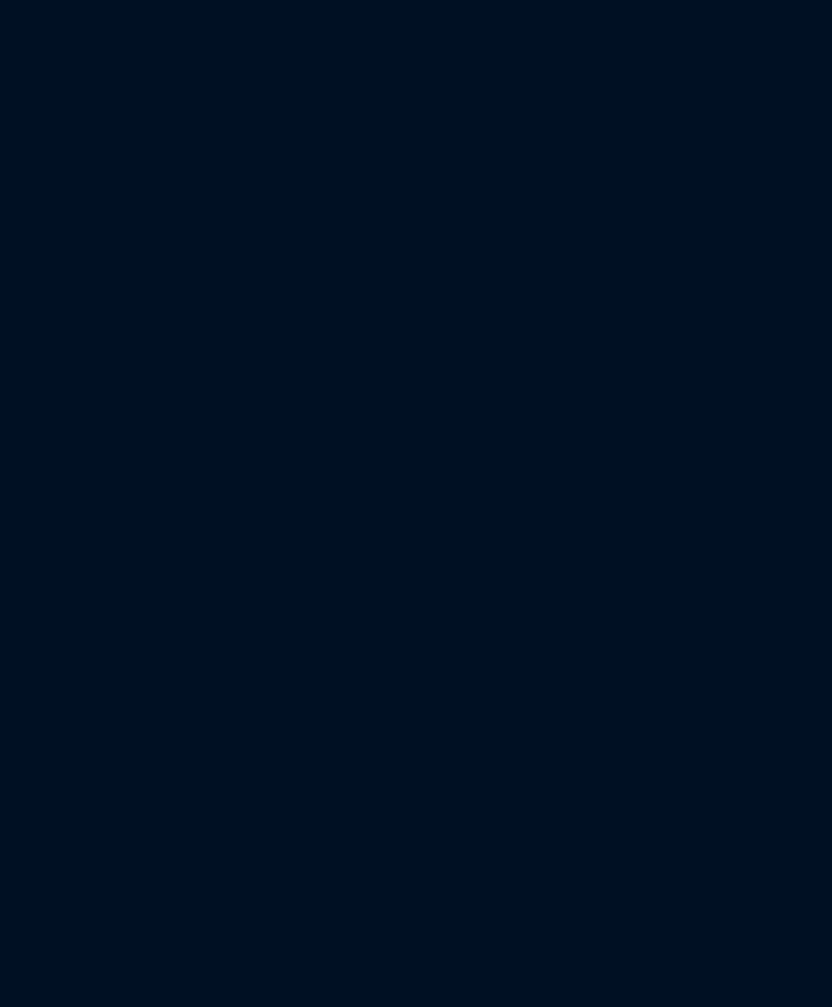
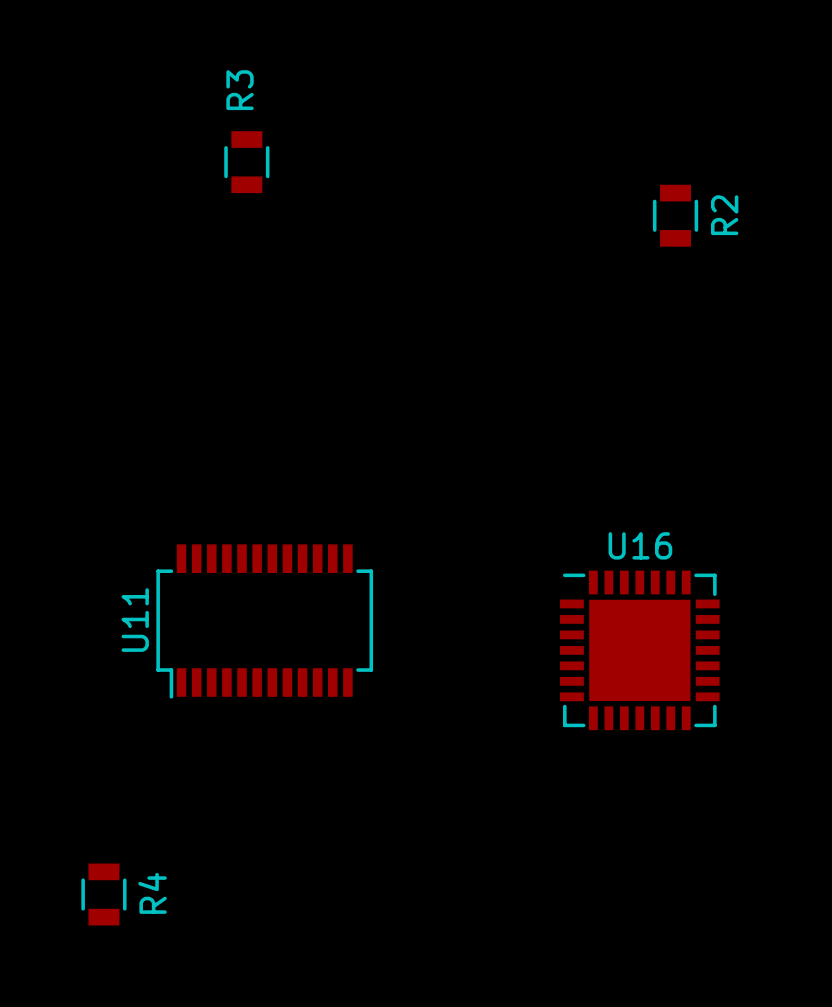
R3: none -> (246, 162)
R2: none -> (675, 215)
U11: none -> (264, 621)
U16: none -> (639, 650)
R4: none -> (103, 894)

